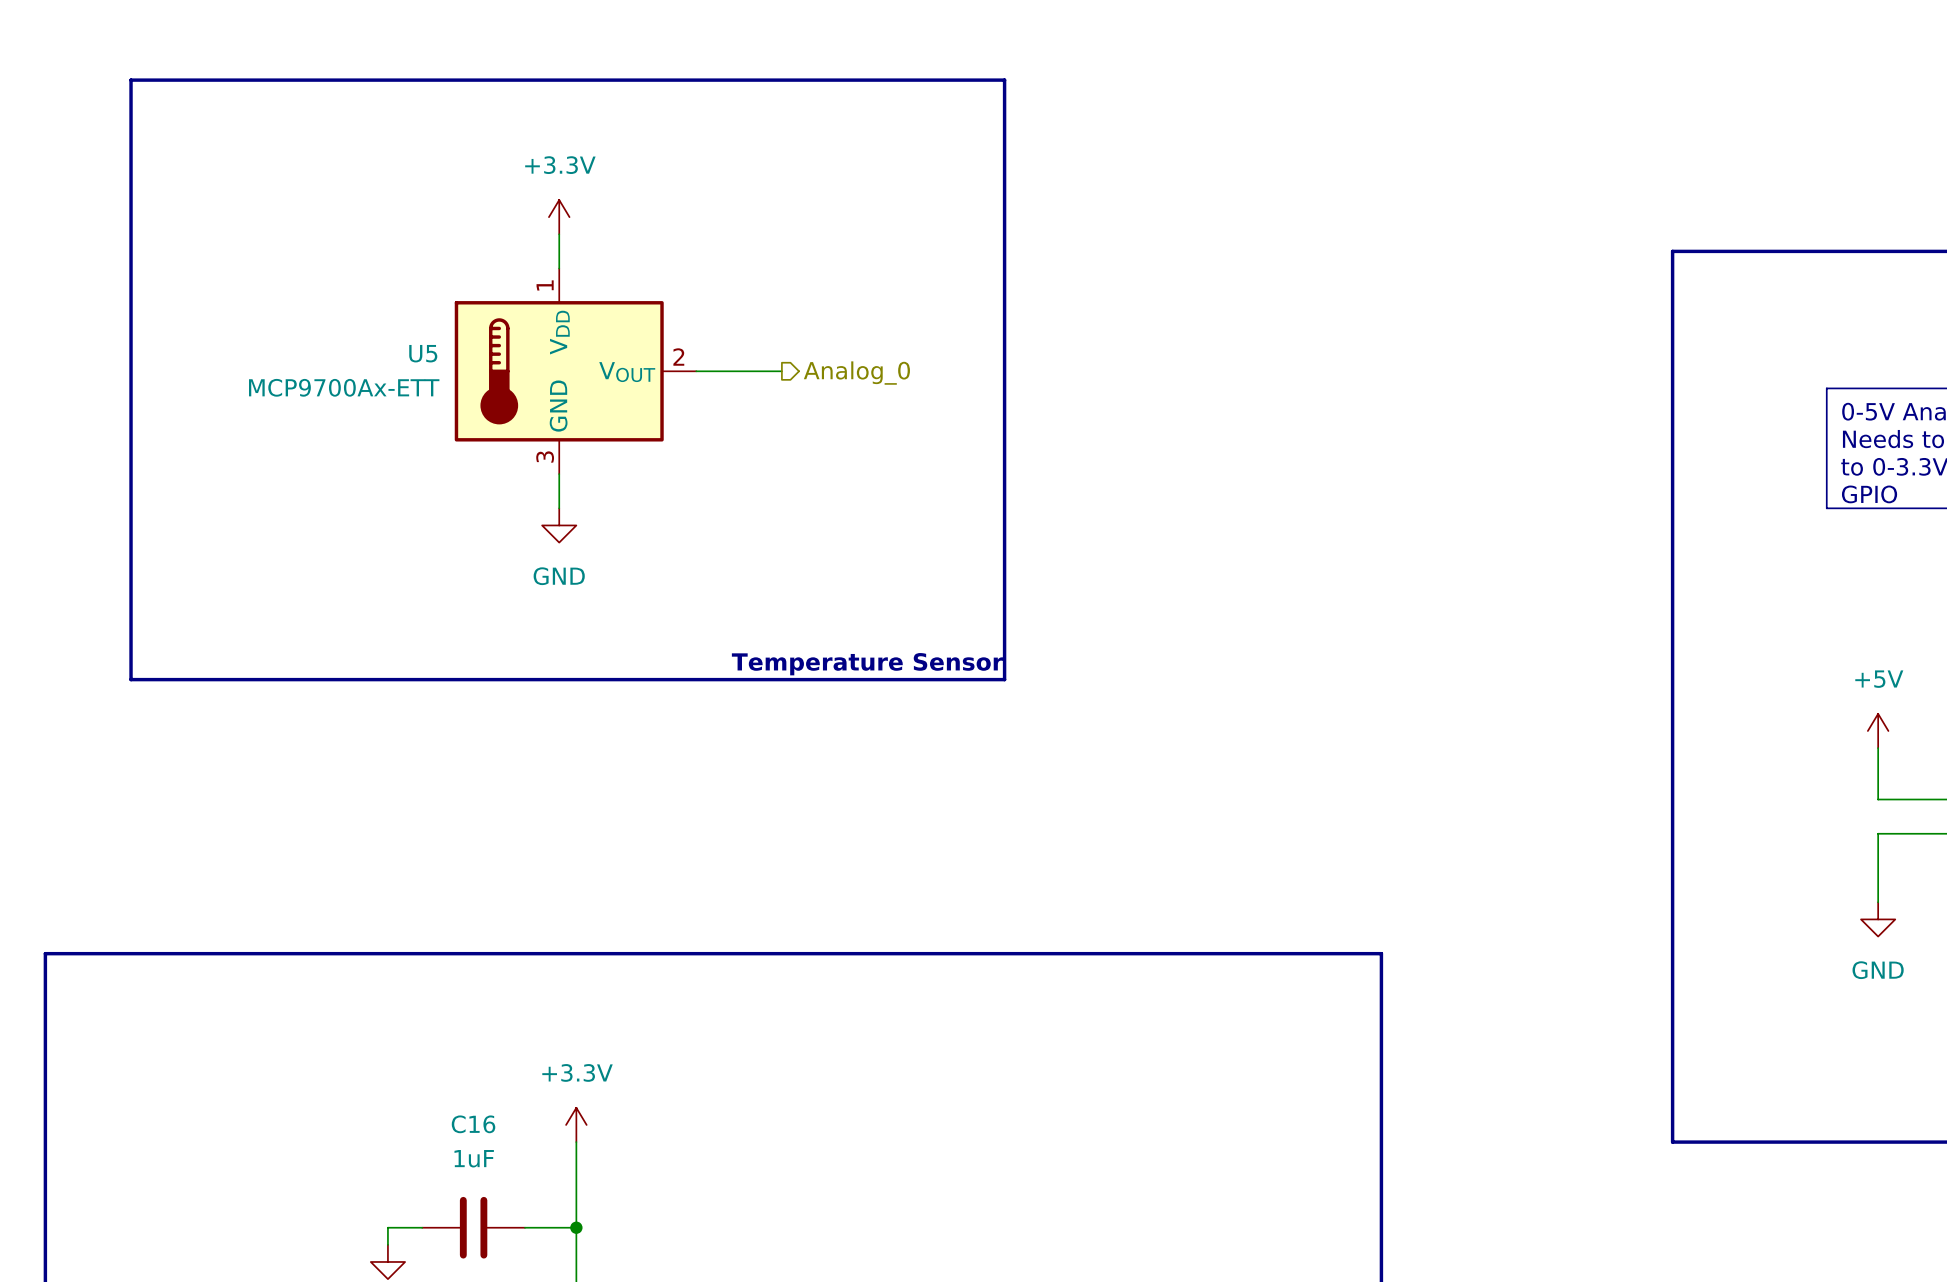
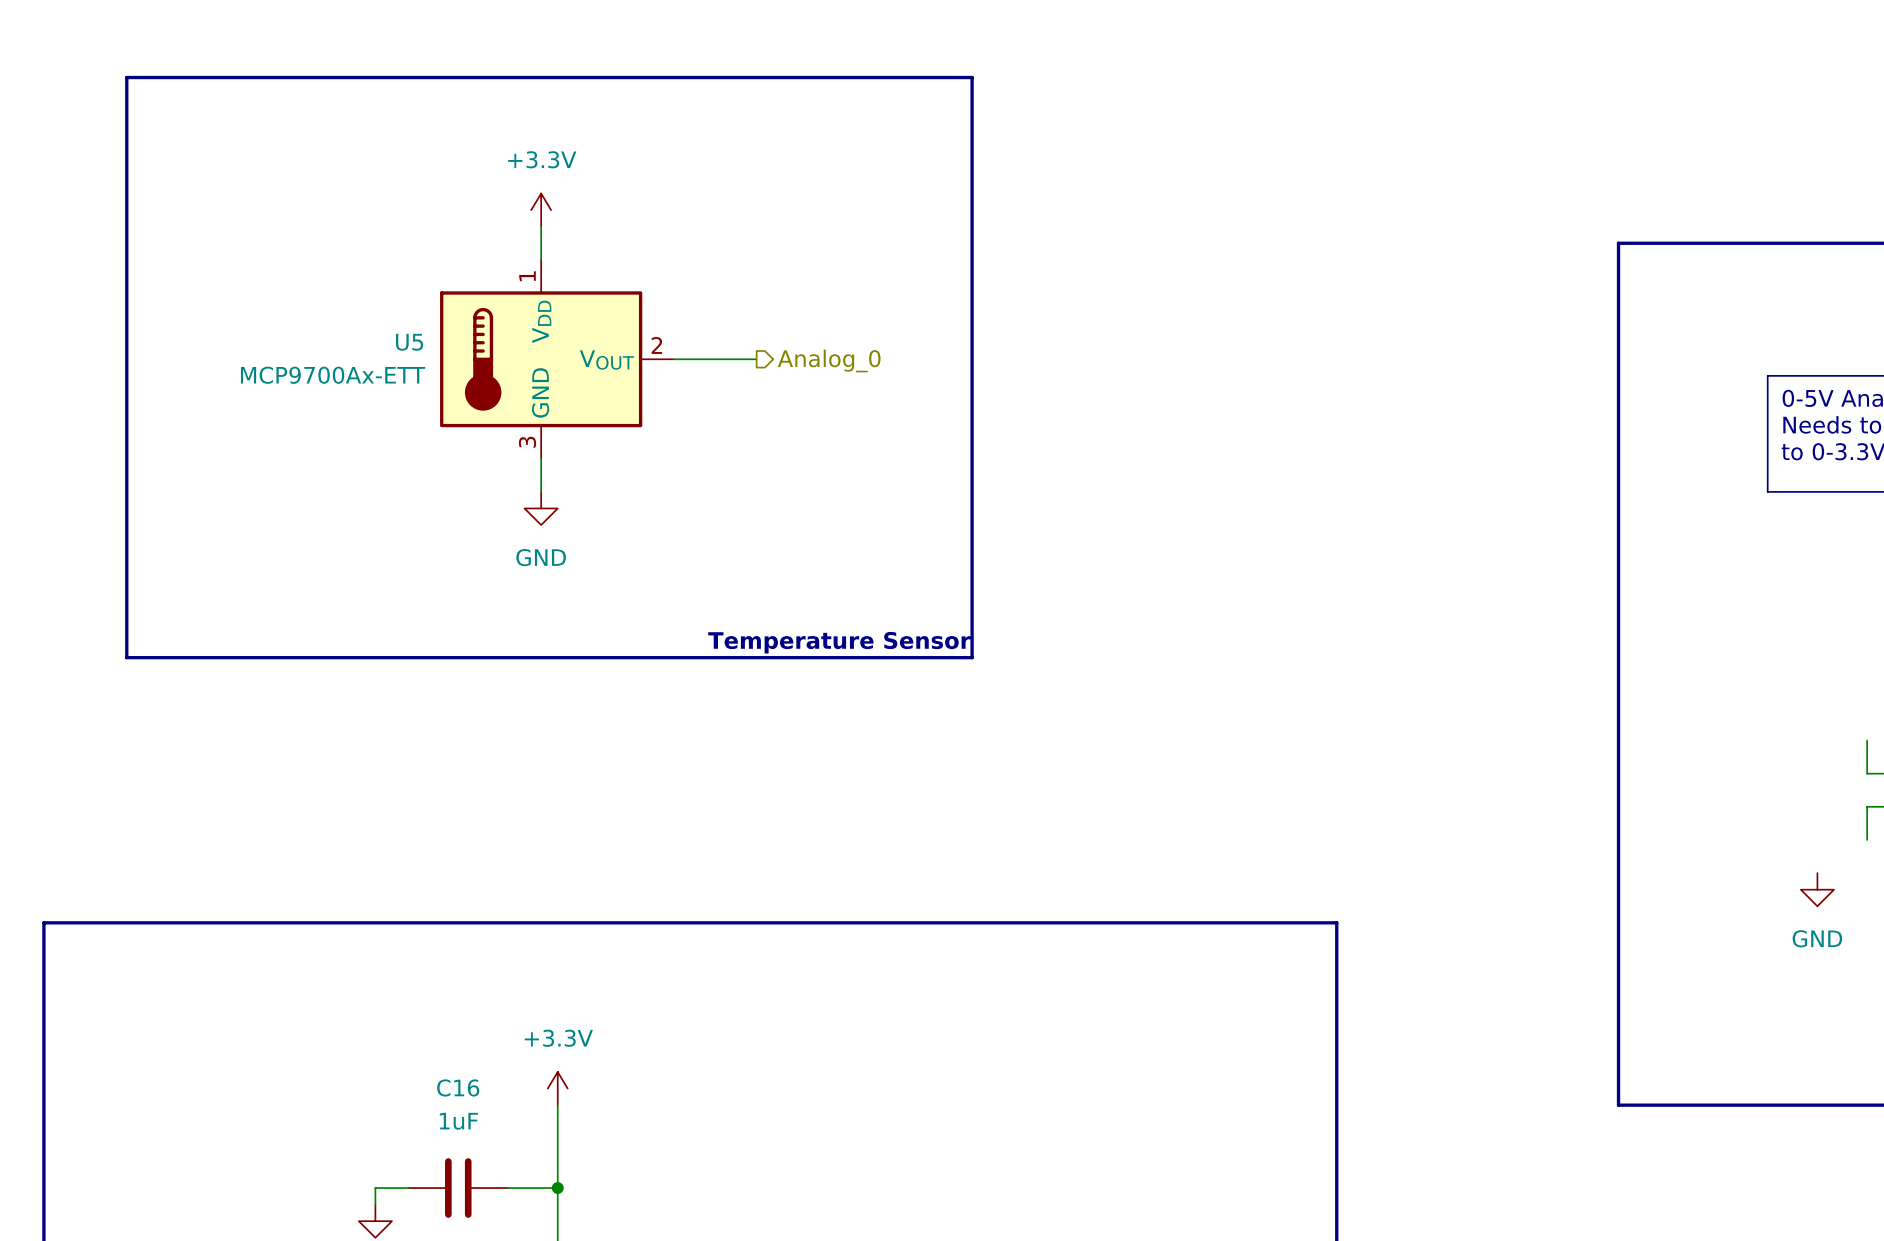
text: GPIO (1869, 494) -> none
power symbol: +5V (1878, 731) -> none
wire: (1878, 748) (1878, 799) (1929, 799) -> (1867, 740) (1867, 773)
wire: (1929, 833) (1878, 833) (1878, 902) -> (1867, 806) (1867, 839)

